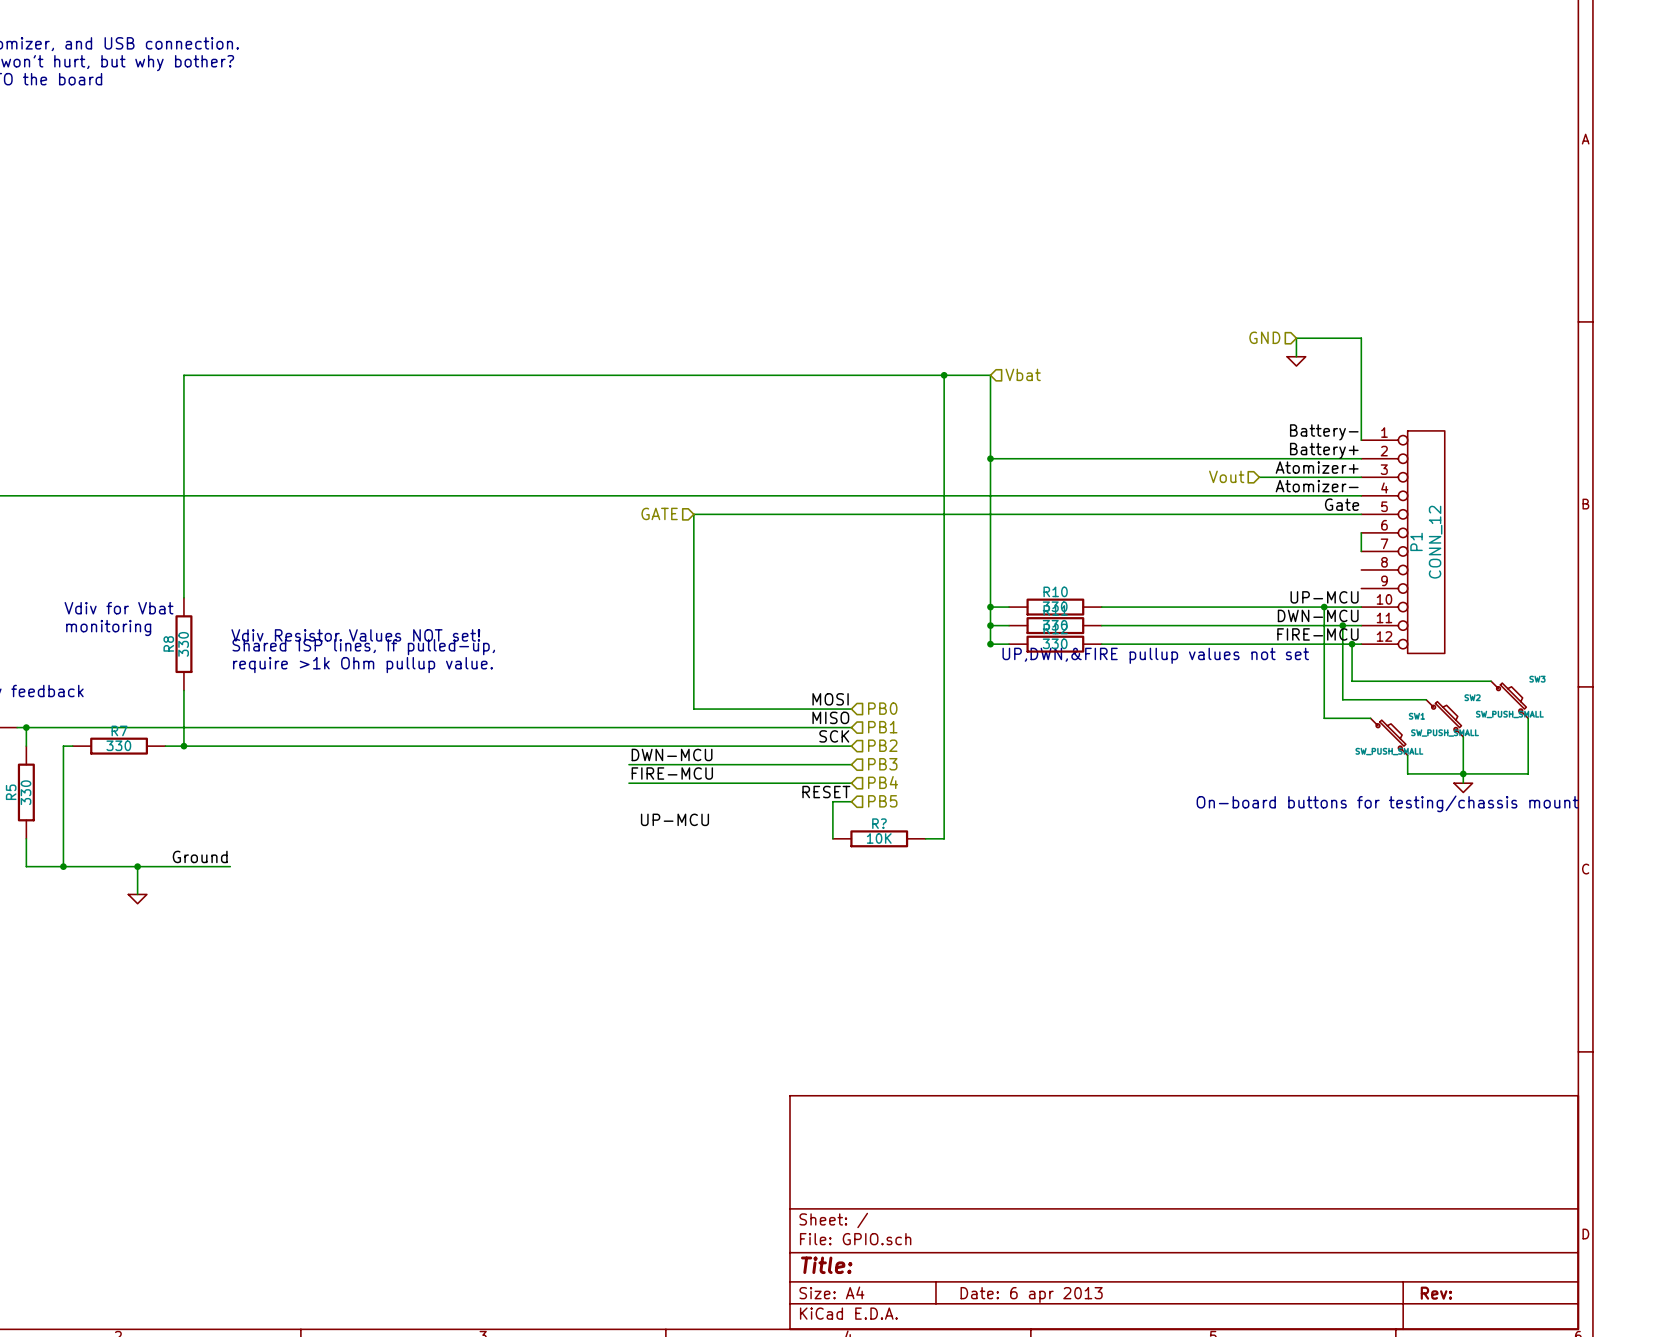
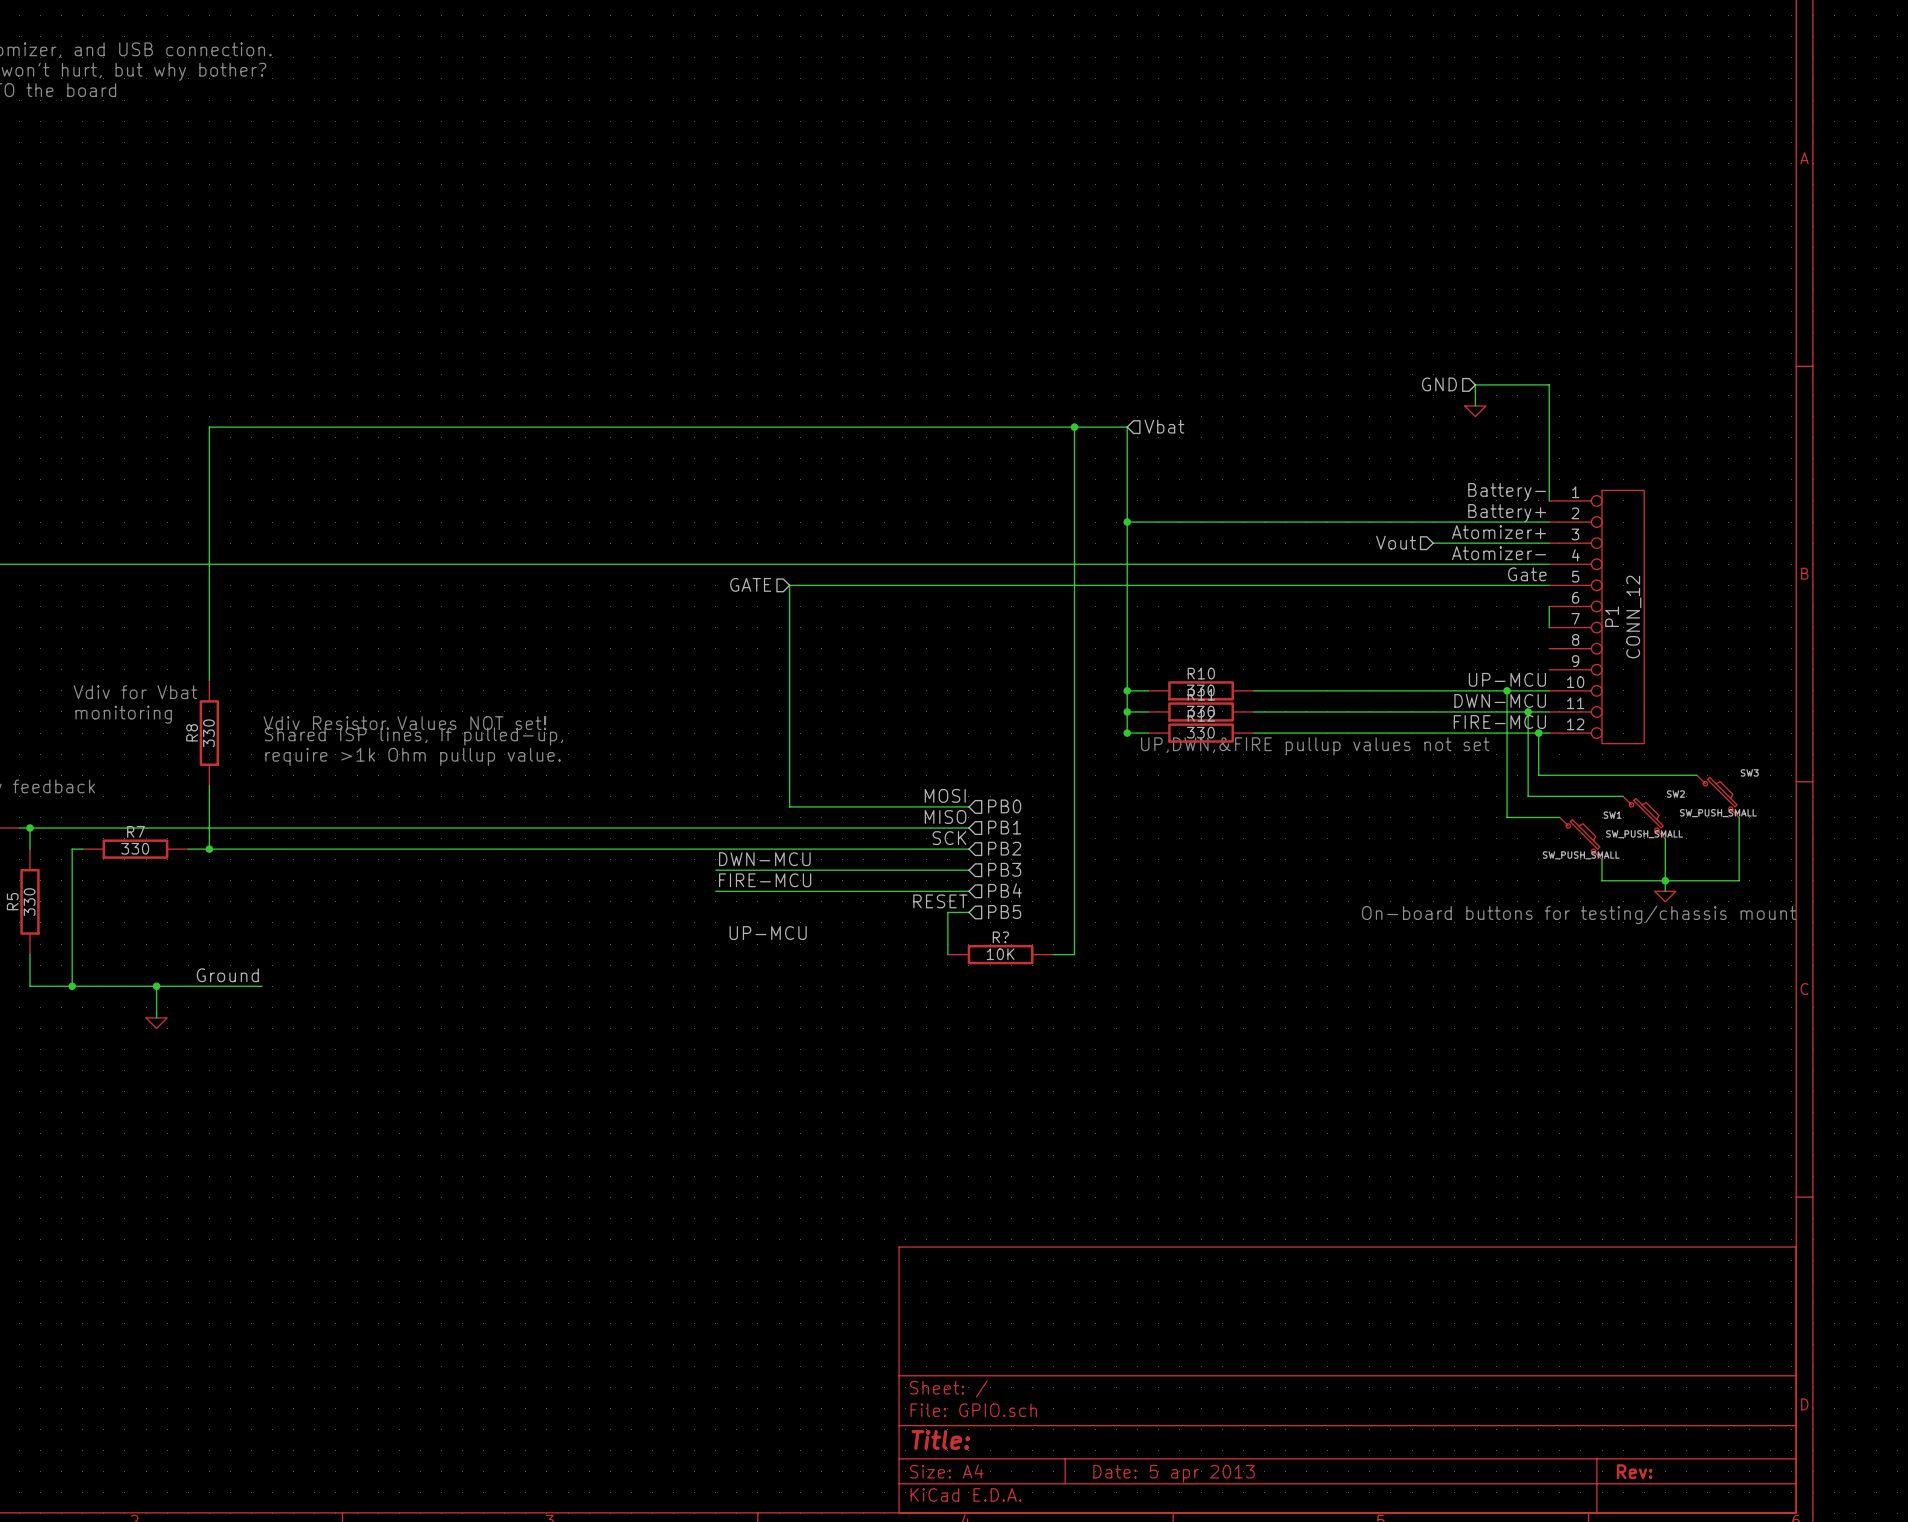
title block: Date: 6 apr 2013 (1031, 1294) -> Date: 5 apr 2013 (1174, 1473)

